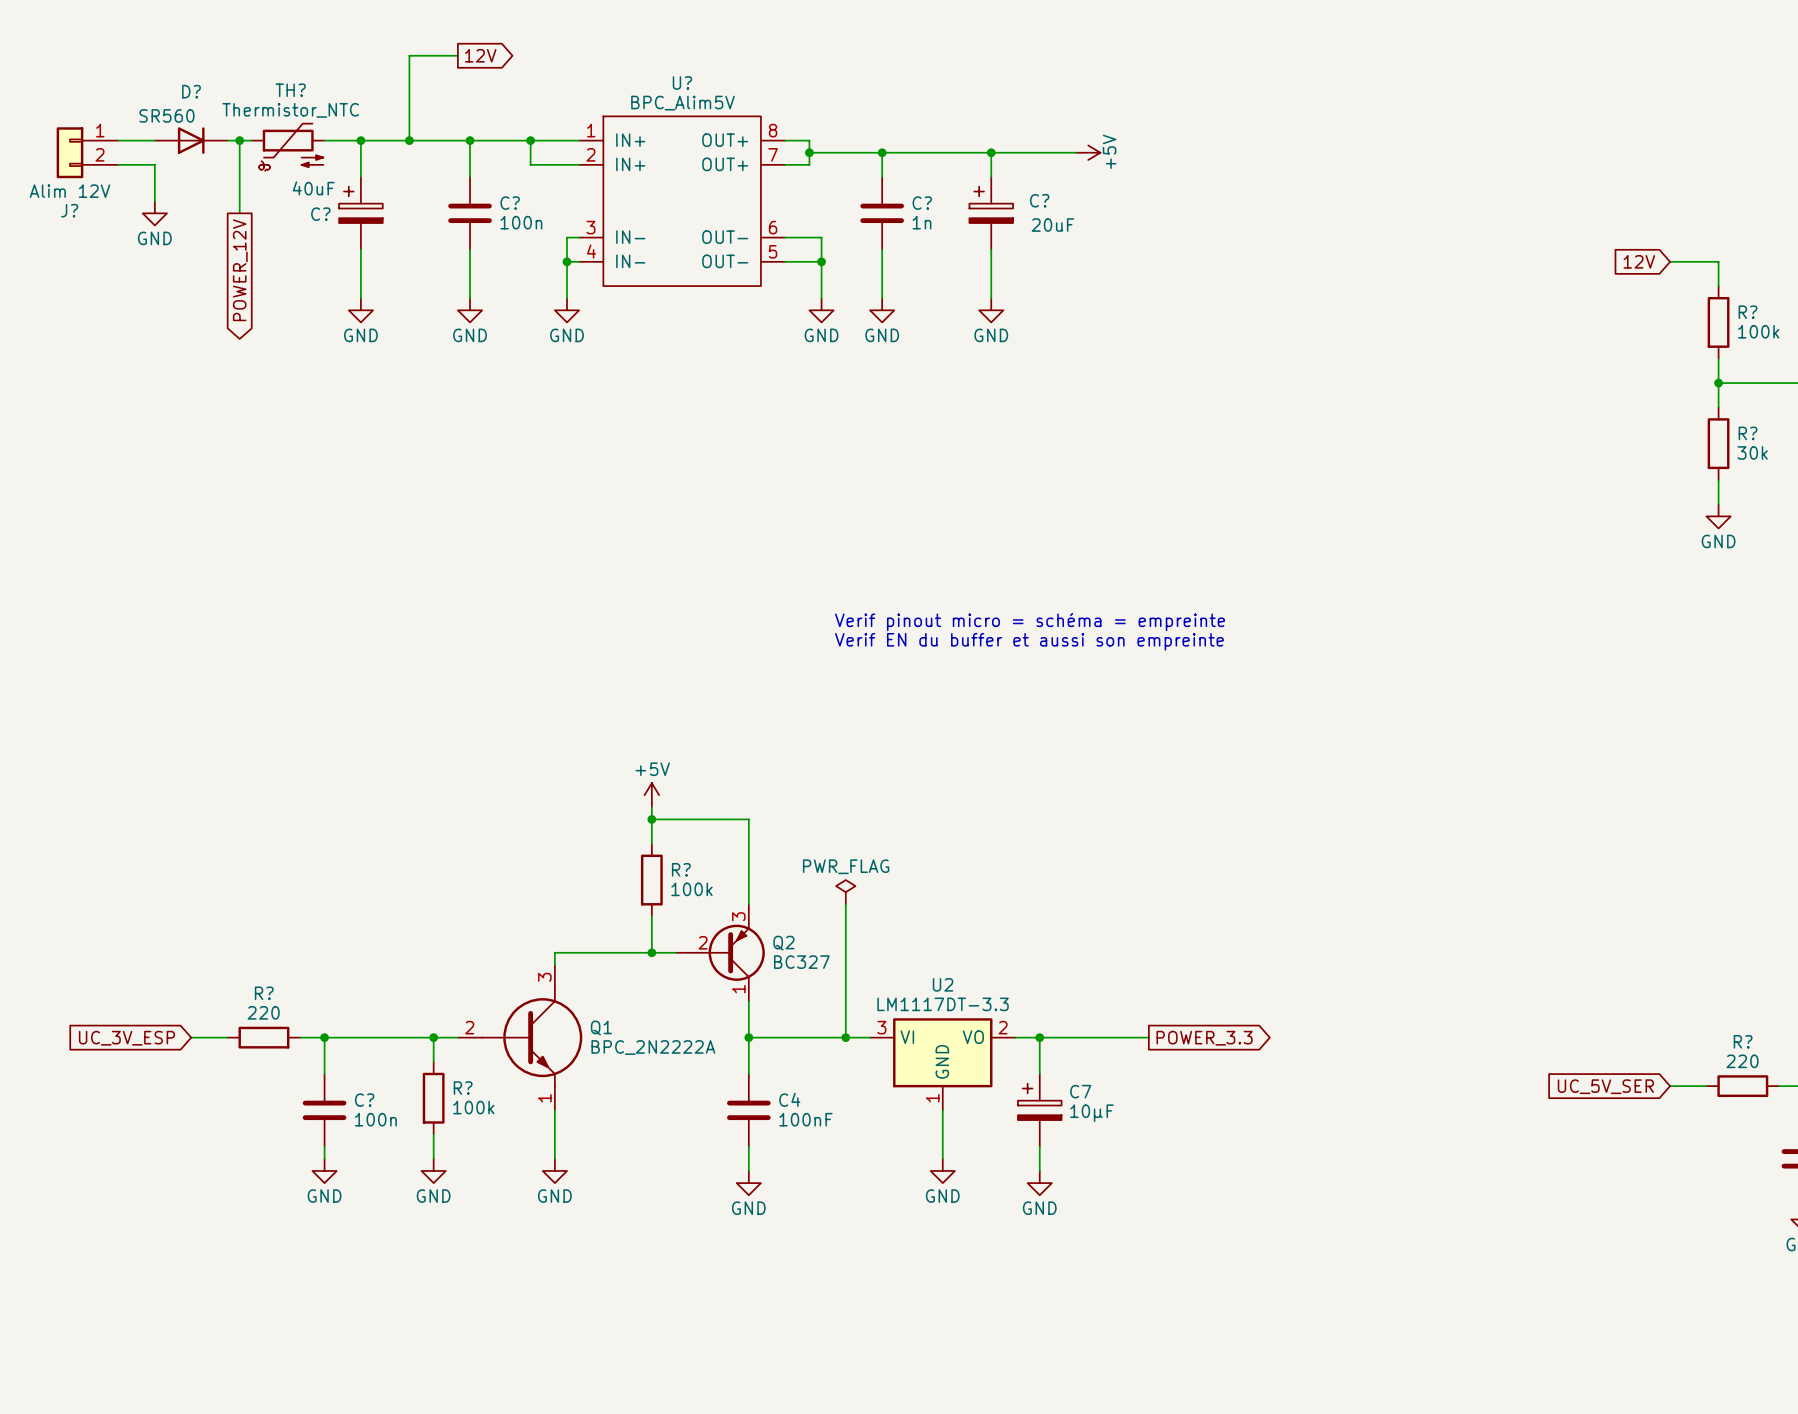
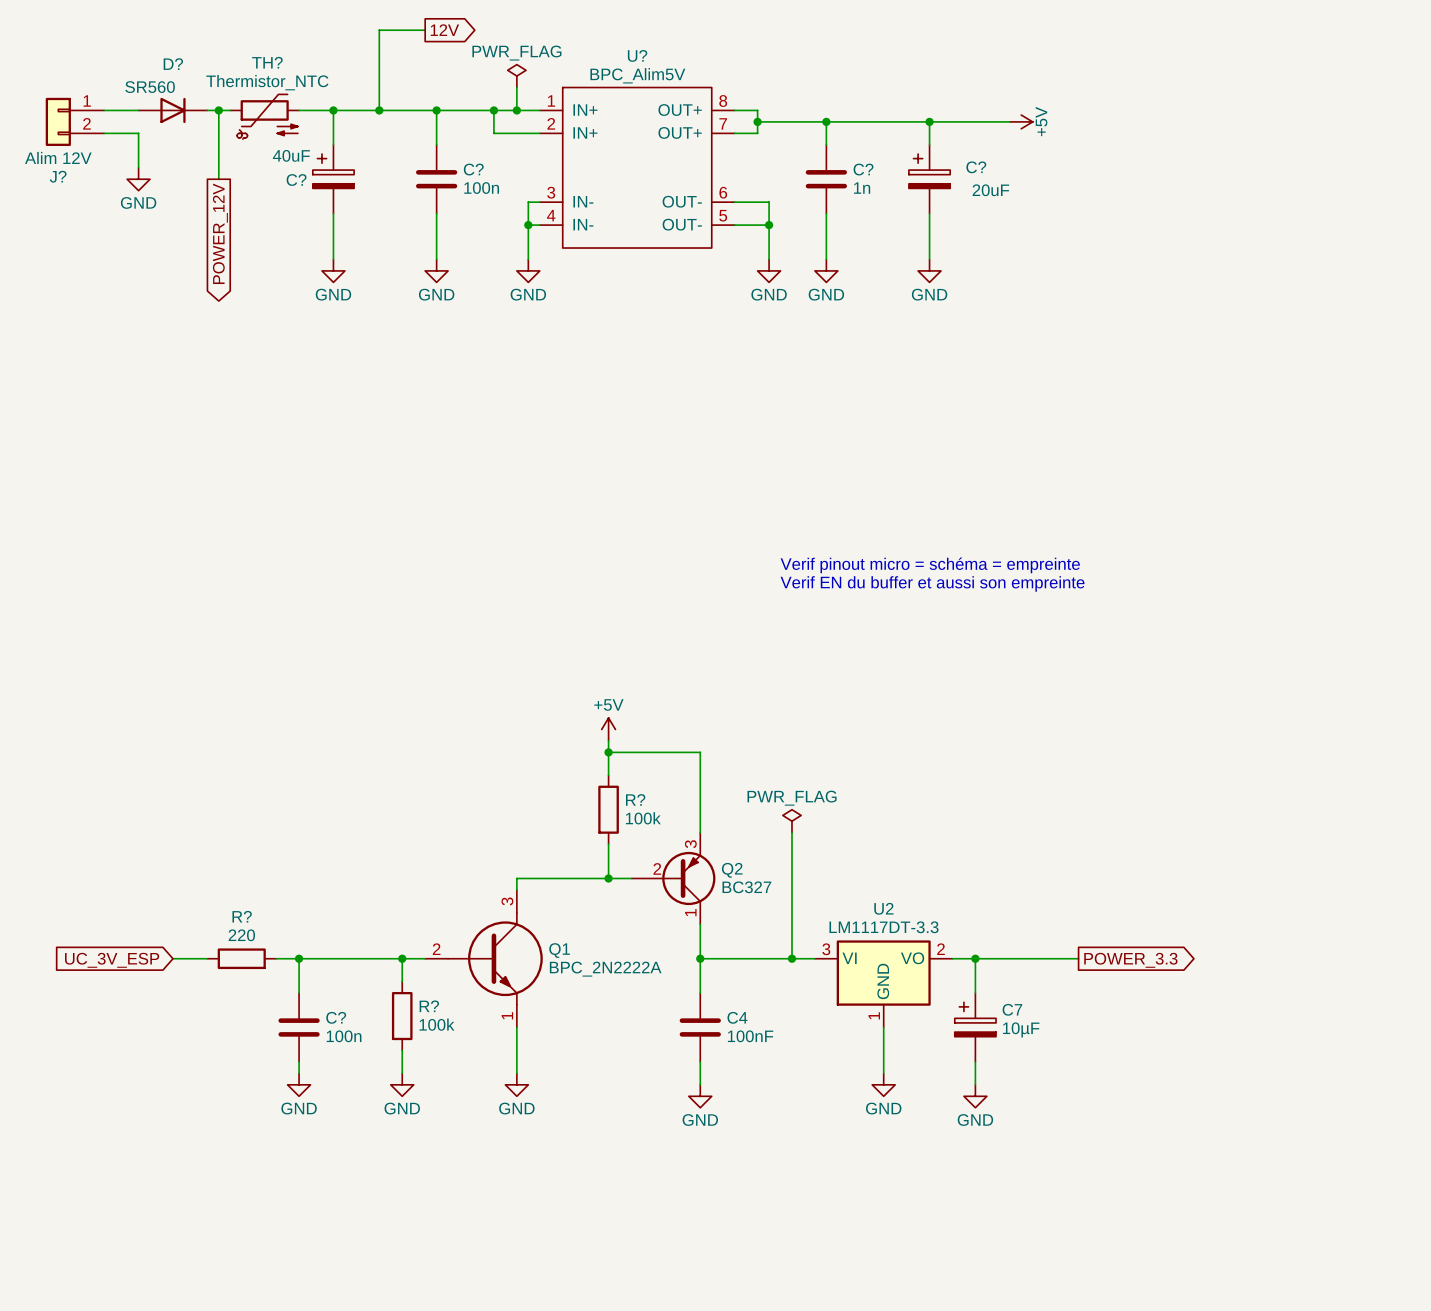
power symbol: none -> PWR_FLAG (516, 76)
wire: none -> (516, 87) (516, 110)
junction: none -> (516, 110)

